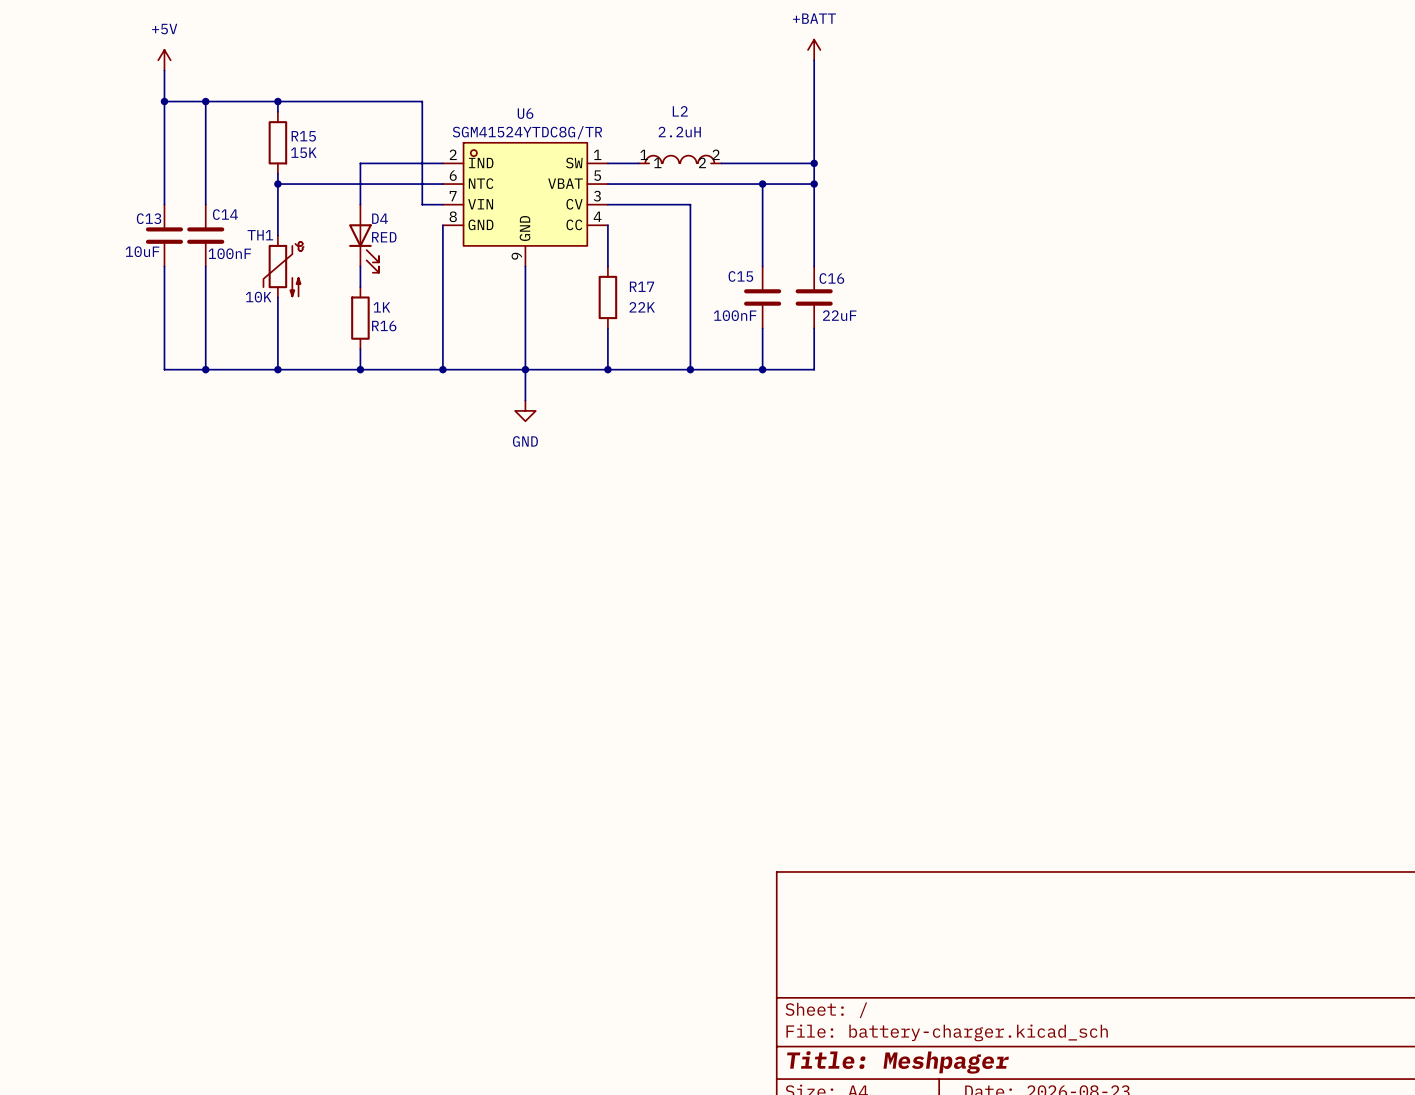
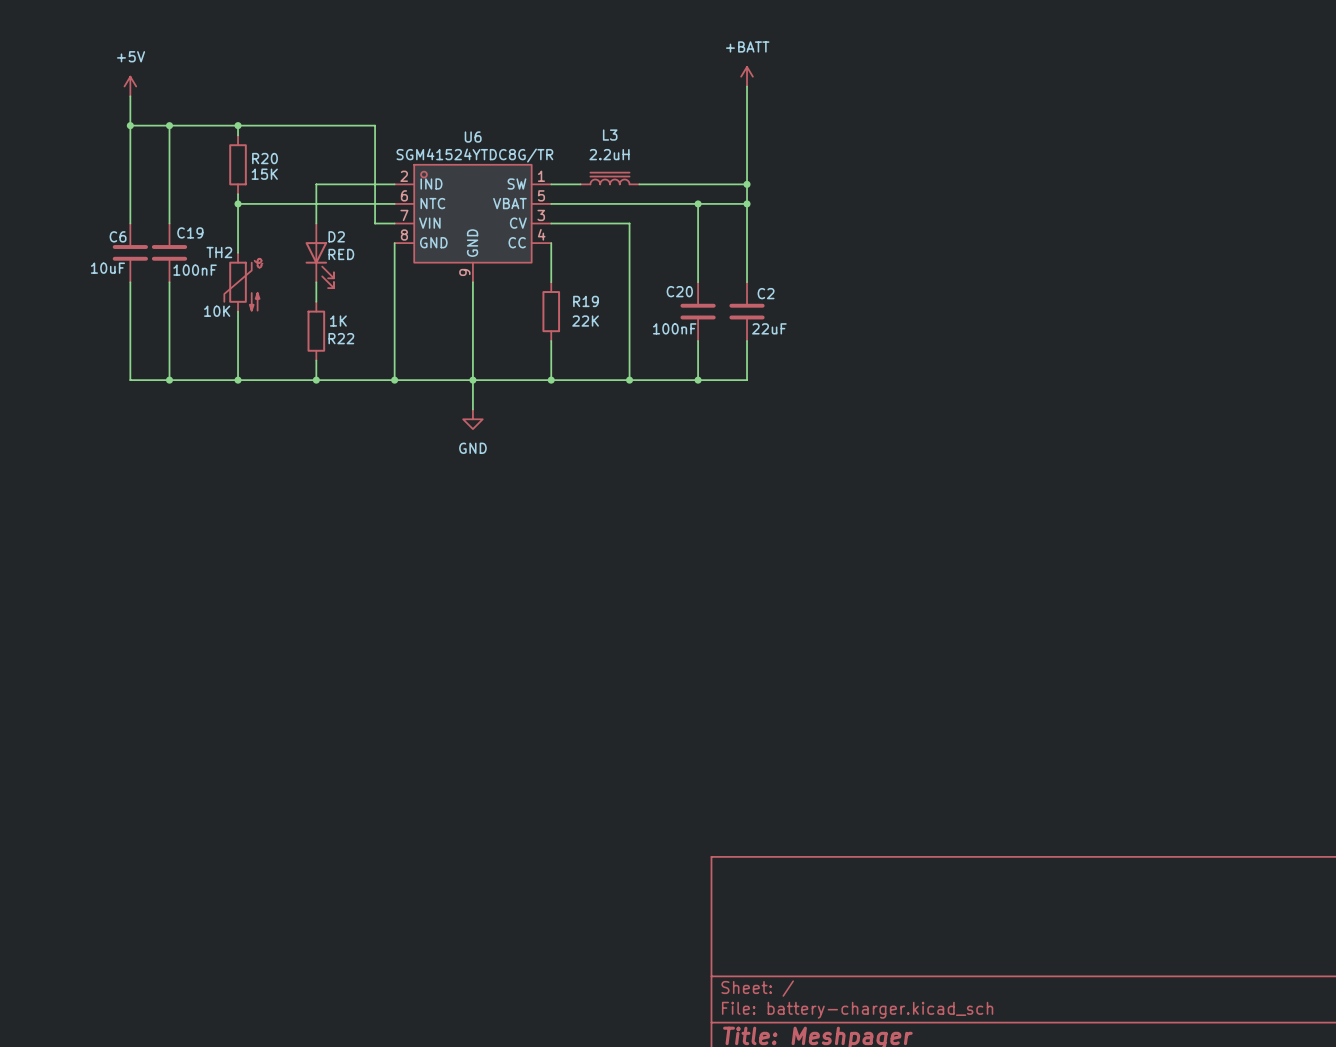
R15 name: R15 (303, 136) -> R20 (264, 158)
L3: none -> 2.2uH (609, 178)
L2: 2.2uH (680, 159) -> none
C14 name: C14 (225, 214) -> C19 (190, 232)
C13 name: C13 (149, 218) -> C6 (118, 236)
D4 name: D4 (380, 218) -> D2 (336, 236)
TH1 name: TH1 (260, 235) -> TH2 (219, 252)
C15 name: C15 (740, 276) -> C20 (679, 291)
C16 name: C16 (831, 278) -> C2 (766, 293)
R17 name: R17 (642, 286) -> R19 (586, 301)
R16 name: R16 (384, 326) -> R22 (341, 338)

